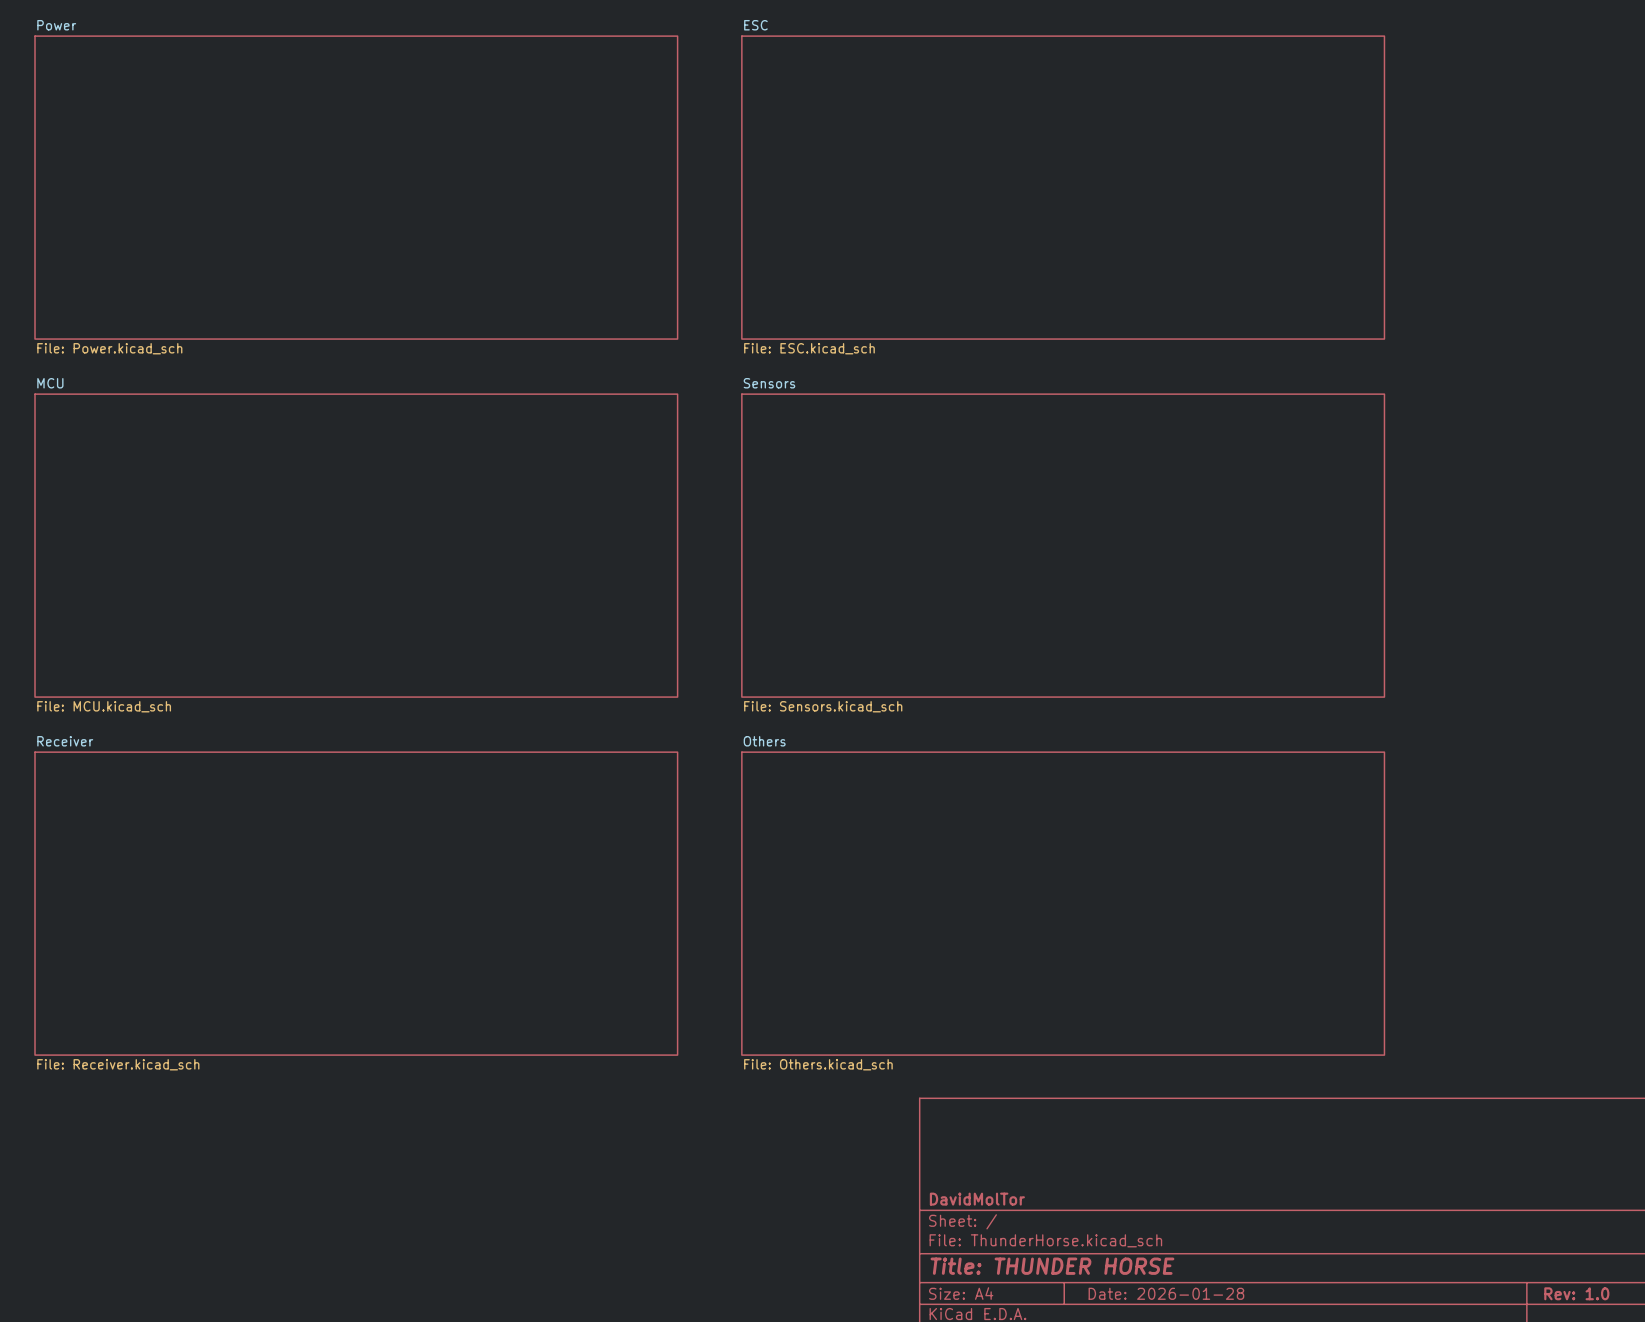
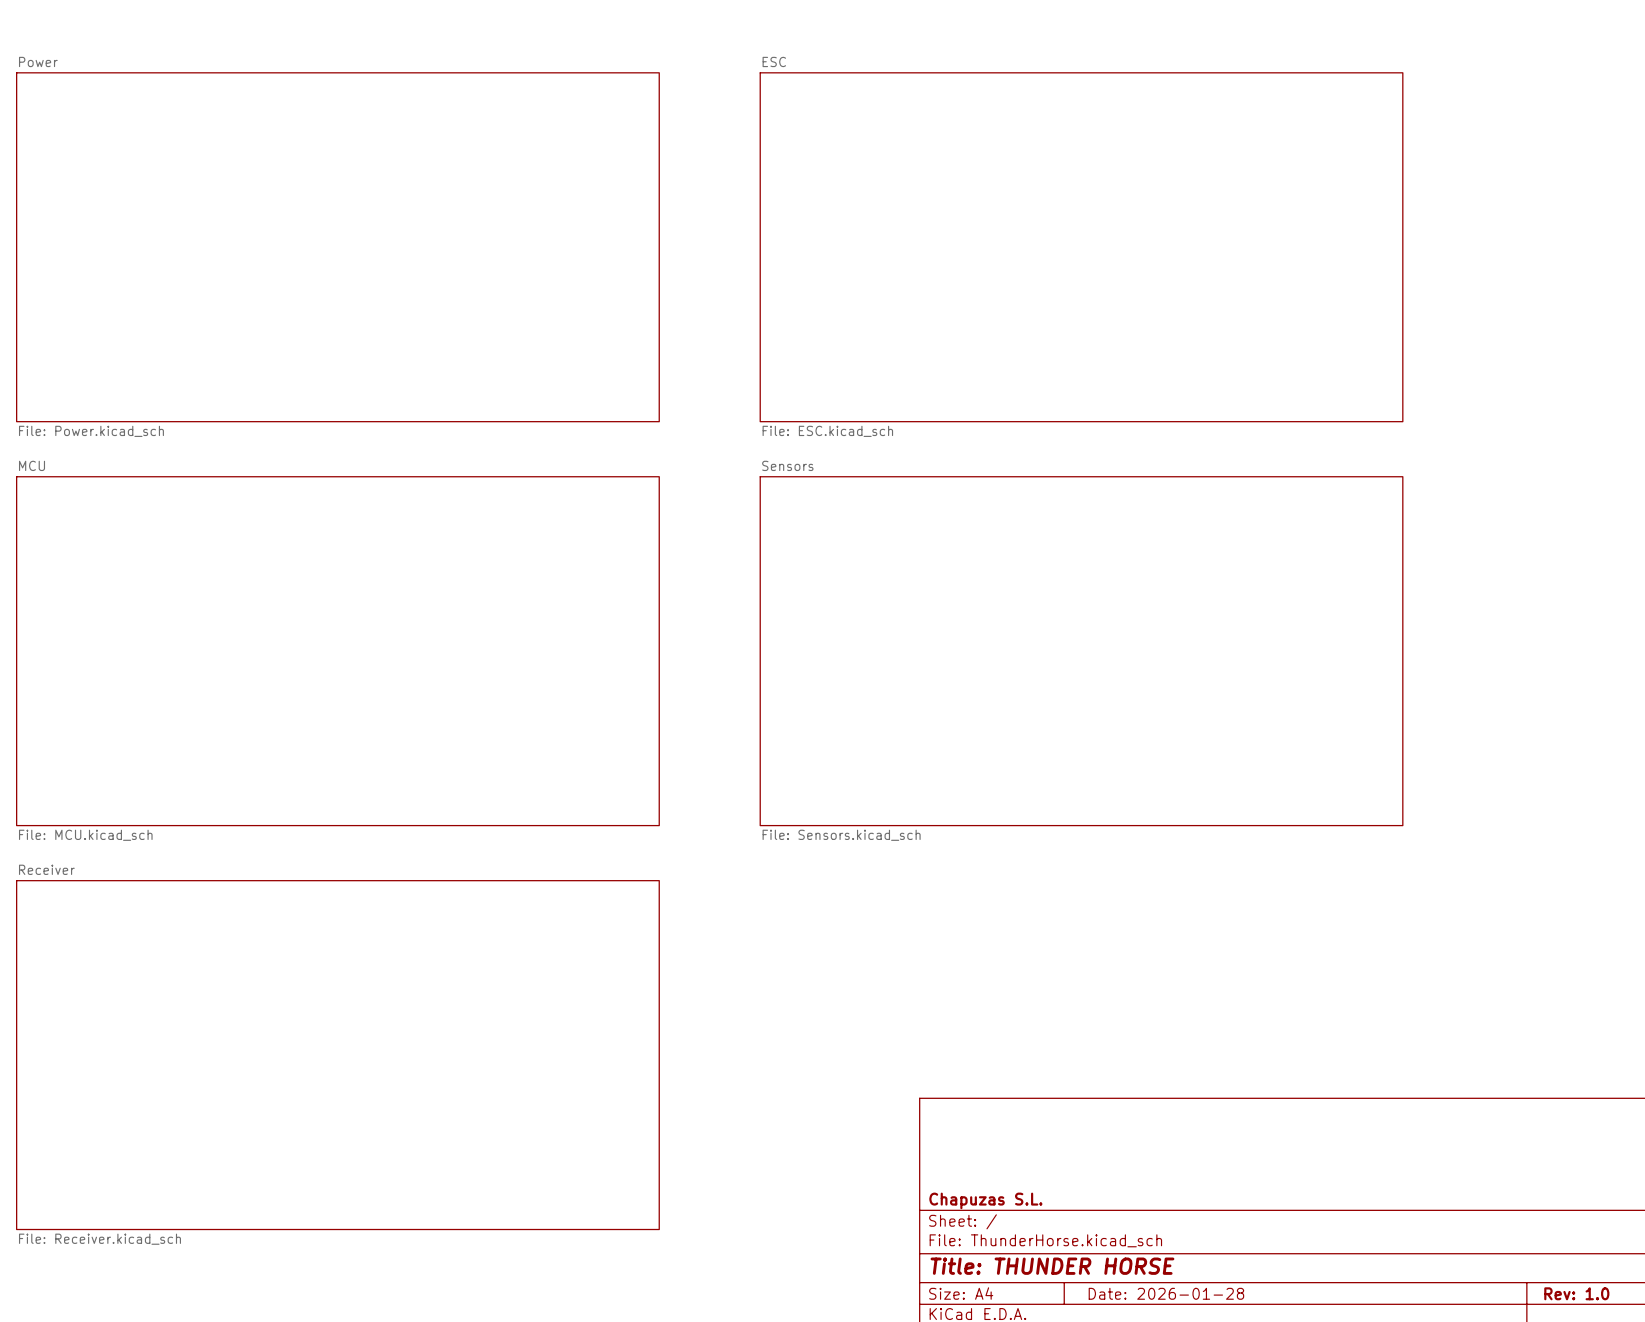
sheet Power: File: Power.kicad_sch (356, 187) -> none
sheet ESC: File: ESC.kicad_sch (1063, 187) -> none
sheet Power: none -> File: Power.kicad_sch (337, 247)
sheet ESC: none -> File: ESC.kicad_sch (1081, 247)
sheet MCU: File: MCU.kicad_sch (356, 545) -> none
sheet Sensors: File: Sensors.kicad_sch (1063, 545) -> none
sheet MCU: none -> File: MCU.kicad_sch (337, 651)
sheet Sensors: none -> File: Sensors.kicad_sch (1081, 651)
sheet Receiver: File: Receiver.kicad_sch (356, 903) -> none
sheet Others: File: Others.kicad_sch (1063, 903) -> none
sheet Receiver: none -> File: Receiver.kicad_sch (337, 1055)
title block: DavidMolTor (977, 1199) -> Chapuzas S.L. (985, 1200)

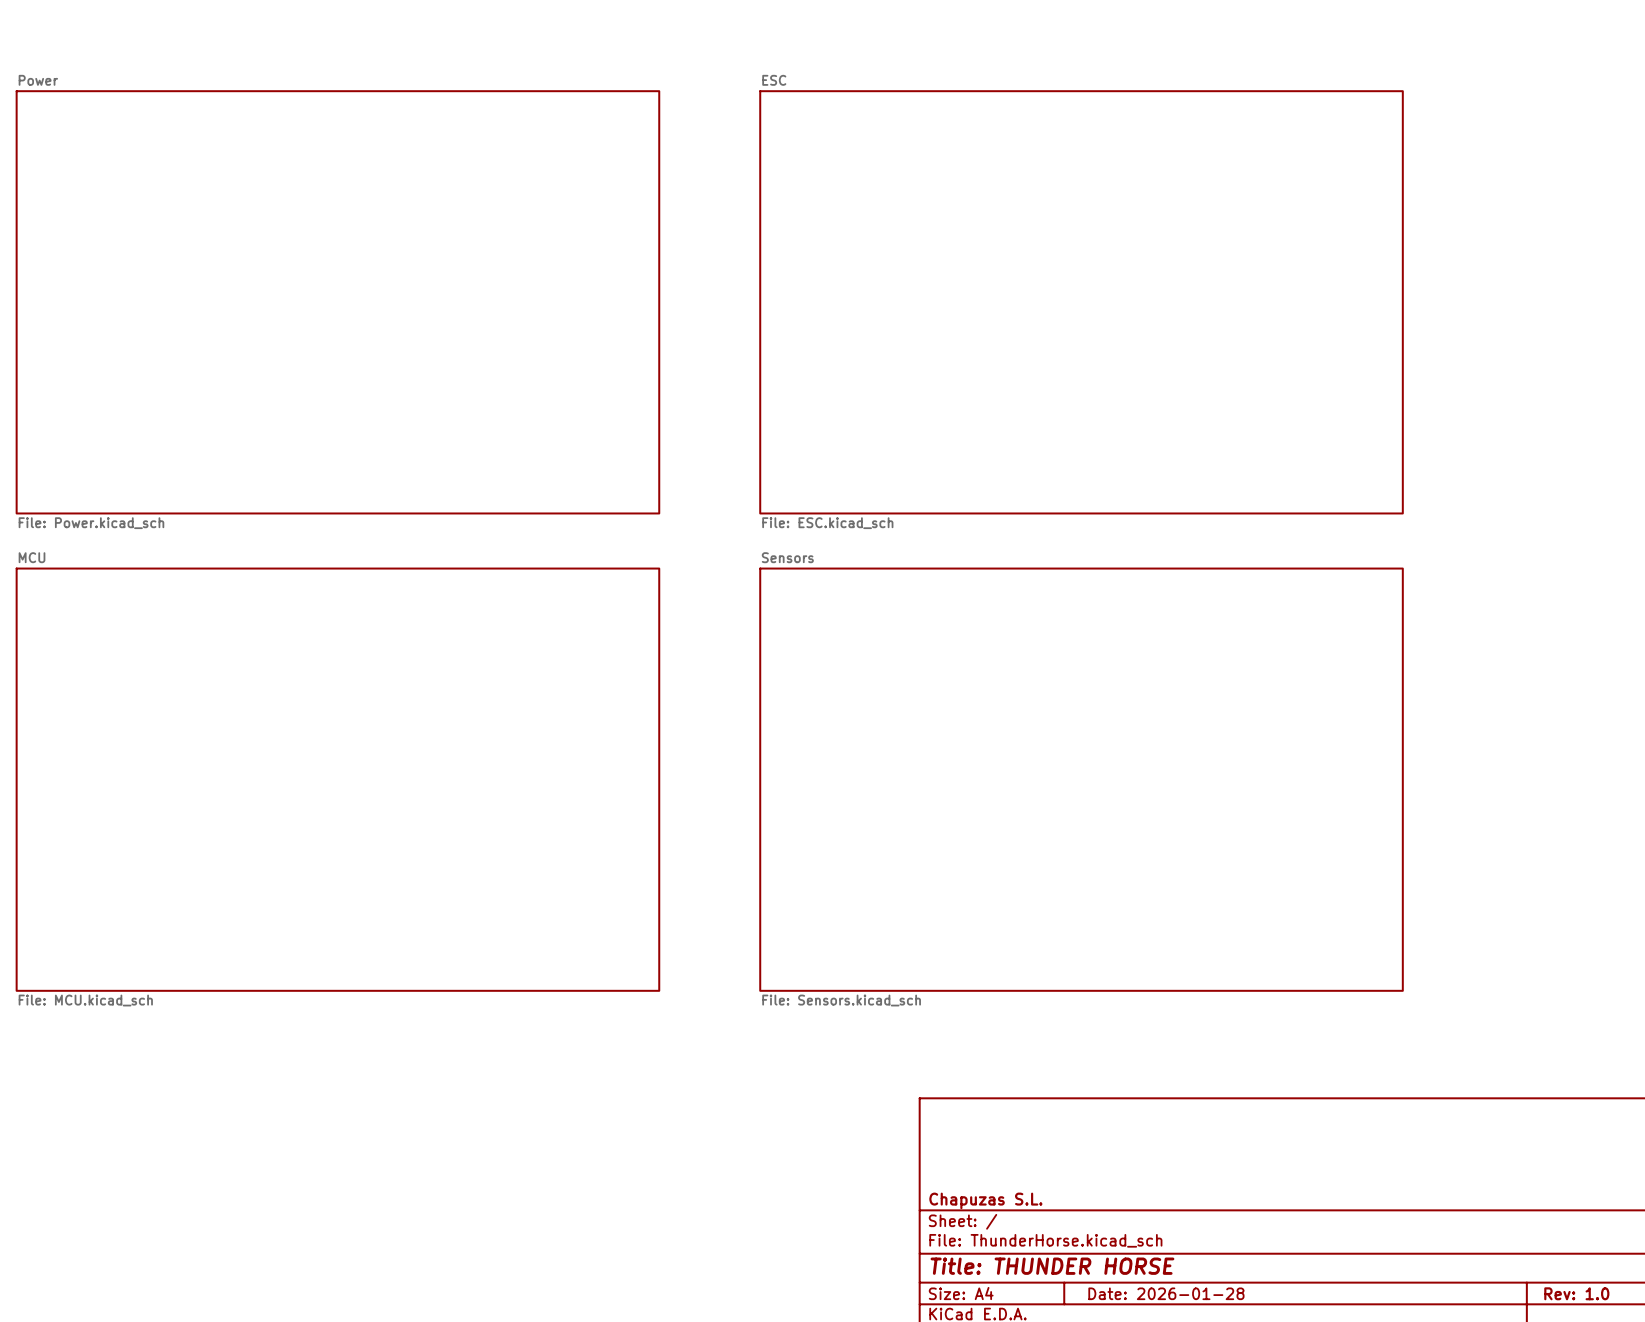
sheet Power: File: Power.kicad_sch (337, 247) -> none
sheet ESC: File: ESC.kicad_sch (1081, 247) -> none
sheet Power: none -> File: Power.kicad_sch (337, 302)
sheet ESC: none -> File: ESC.kicad_sch (1081, 302)
sheet MCU: File: MCU.kicad_sch (337, 651) -> none
sheet Sensors: File: Sensors.kicad_sch (1081, 651) -> none
sheet MCU: none -> File: MCU.kicad_sch (337, 779)
sheet Sensors: none -> File: Sensors.kicad_sch (1081, 779)
sheet Receiver: File: Receiver.kicad_sch (337, 1055) -> none

